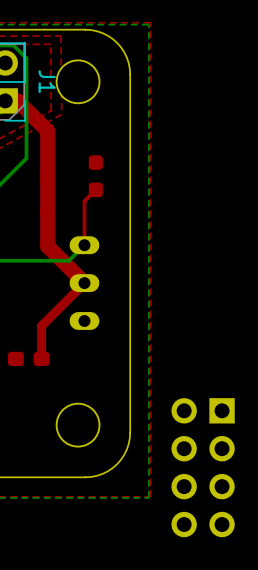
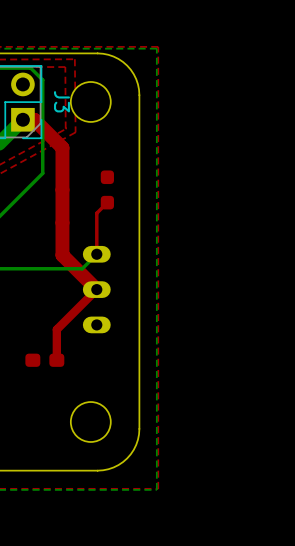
J1 name: J1 (47, 81) -> J3 (61, 101)
part: (203, 467) -> none

